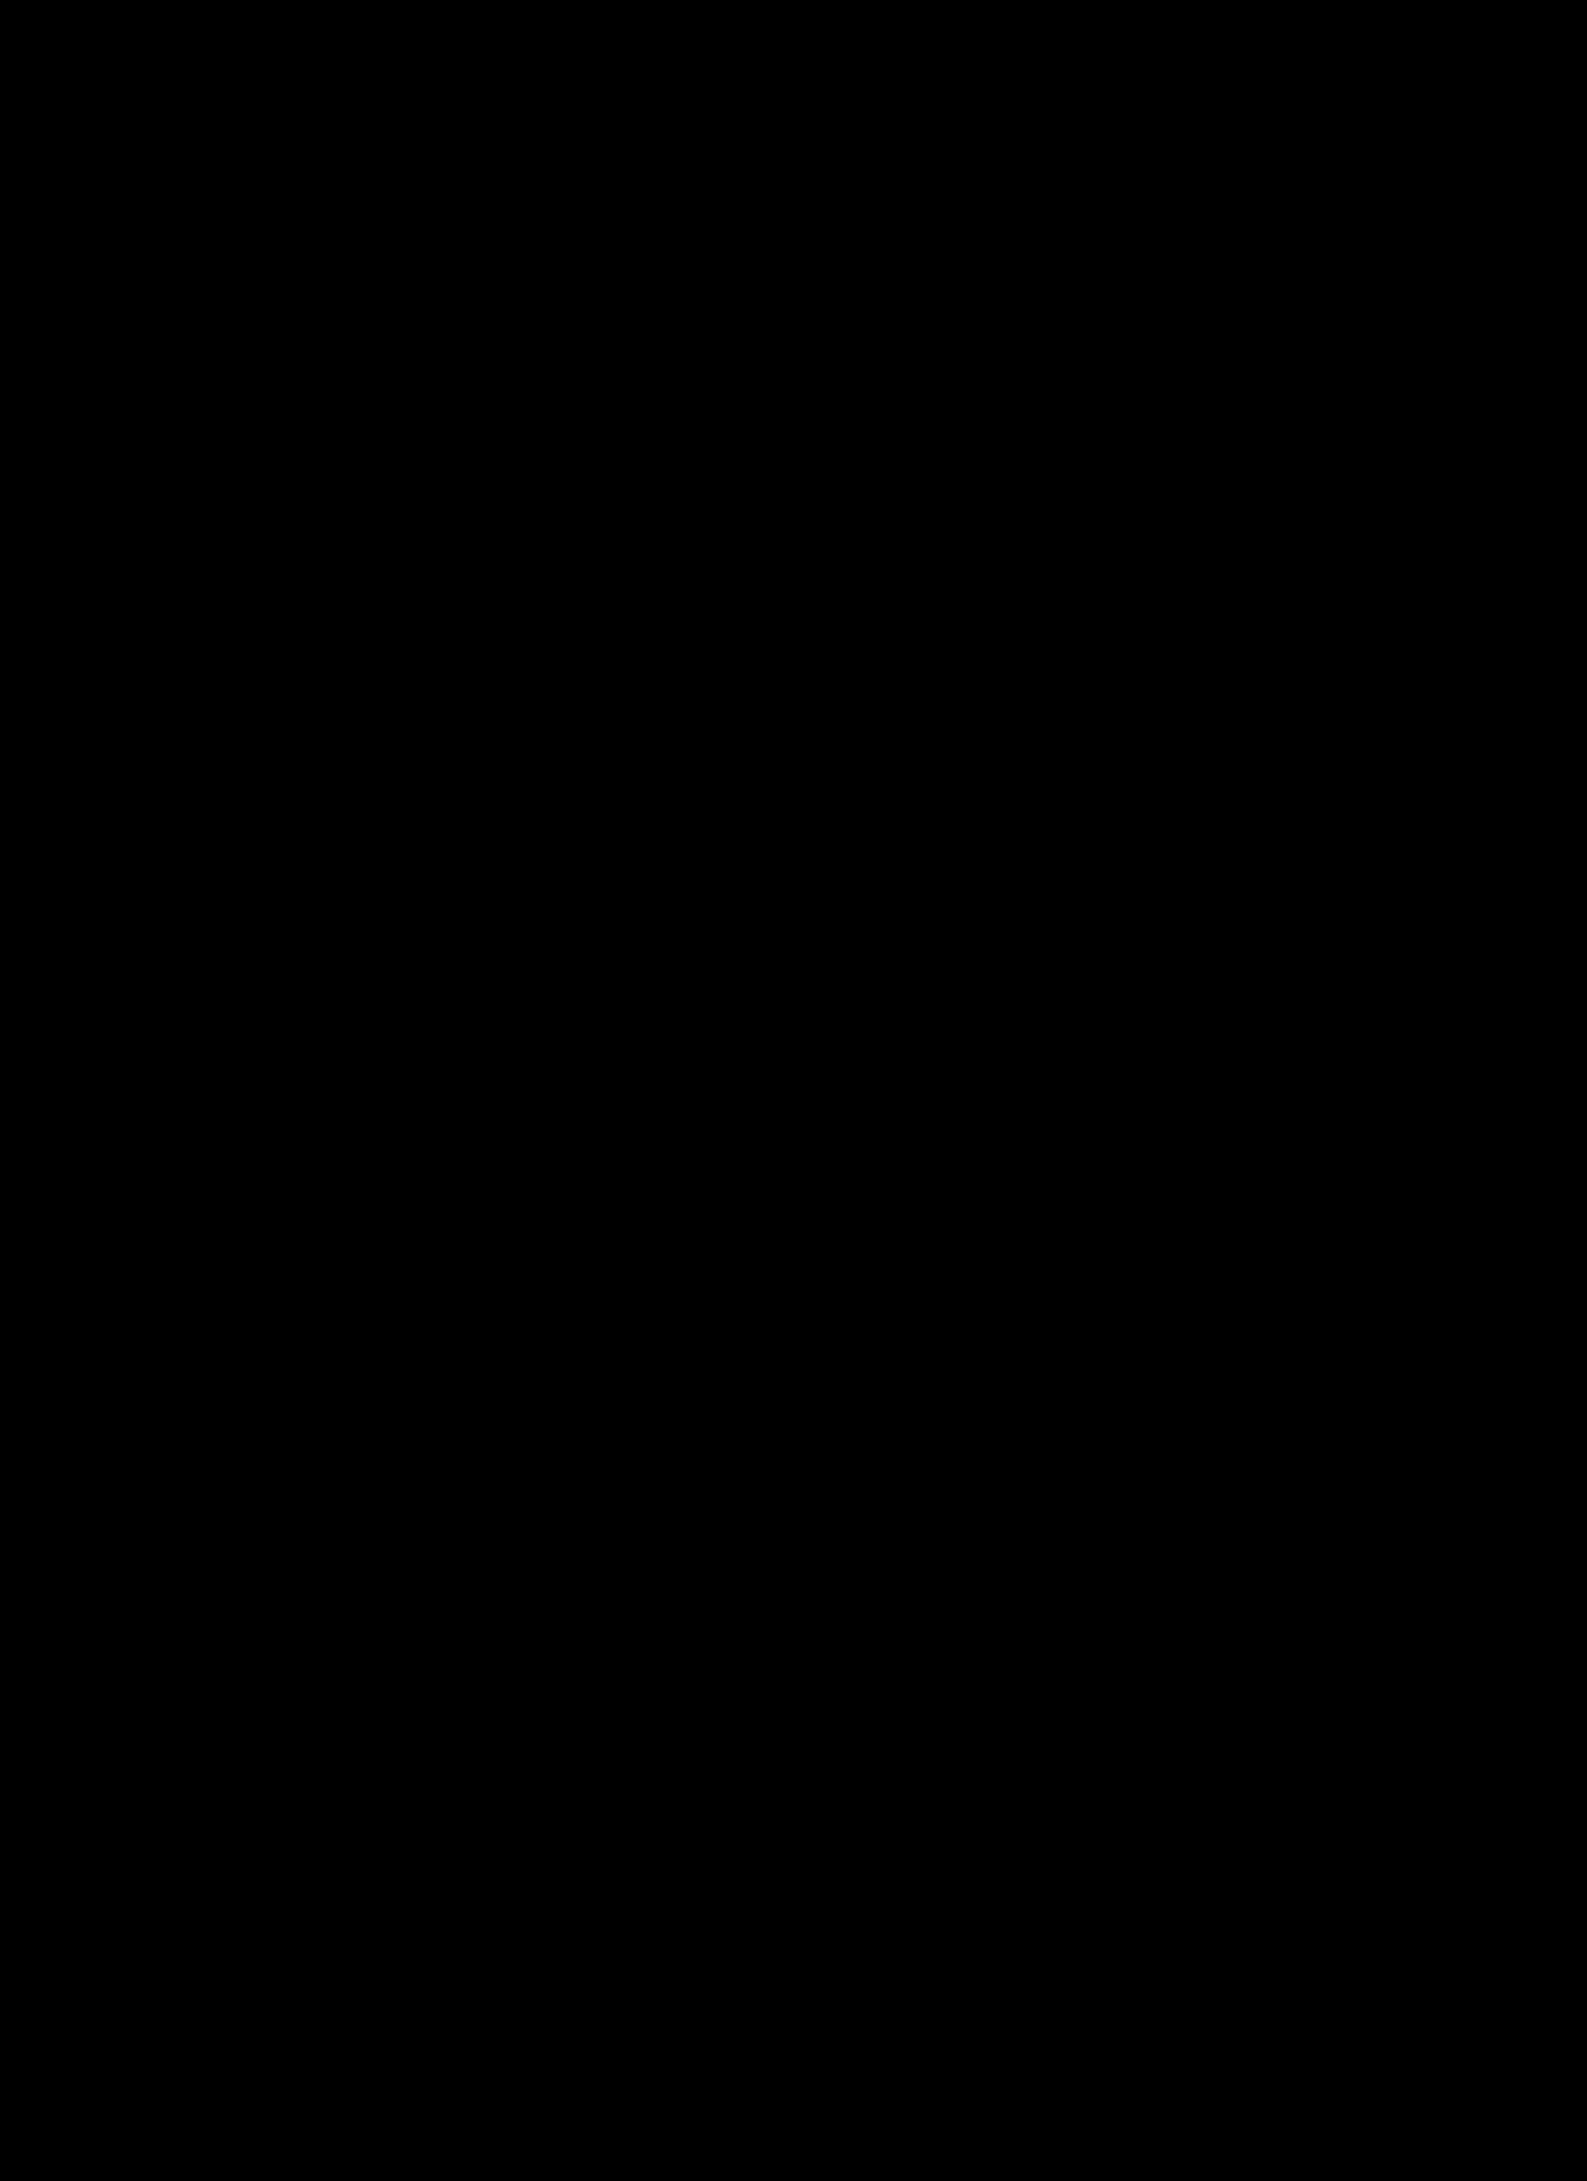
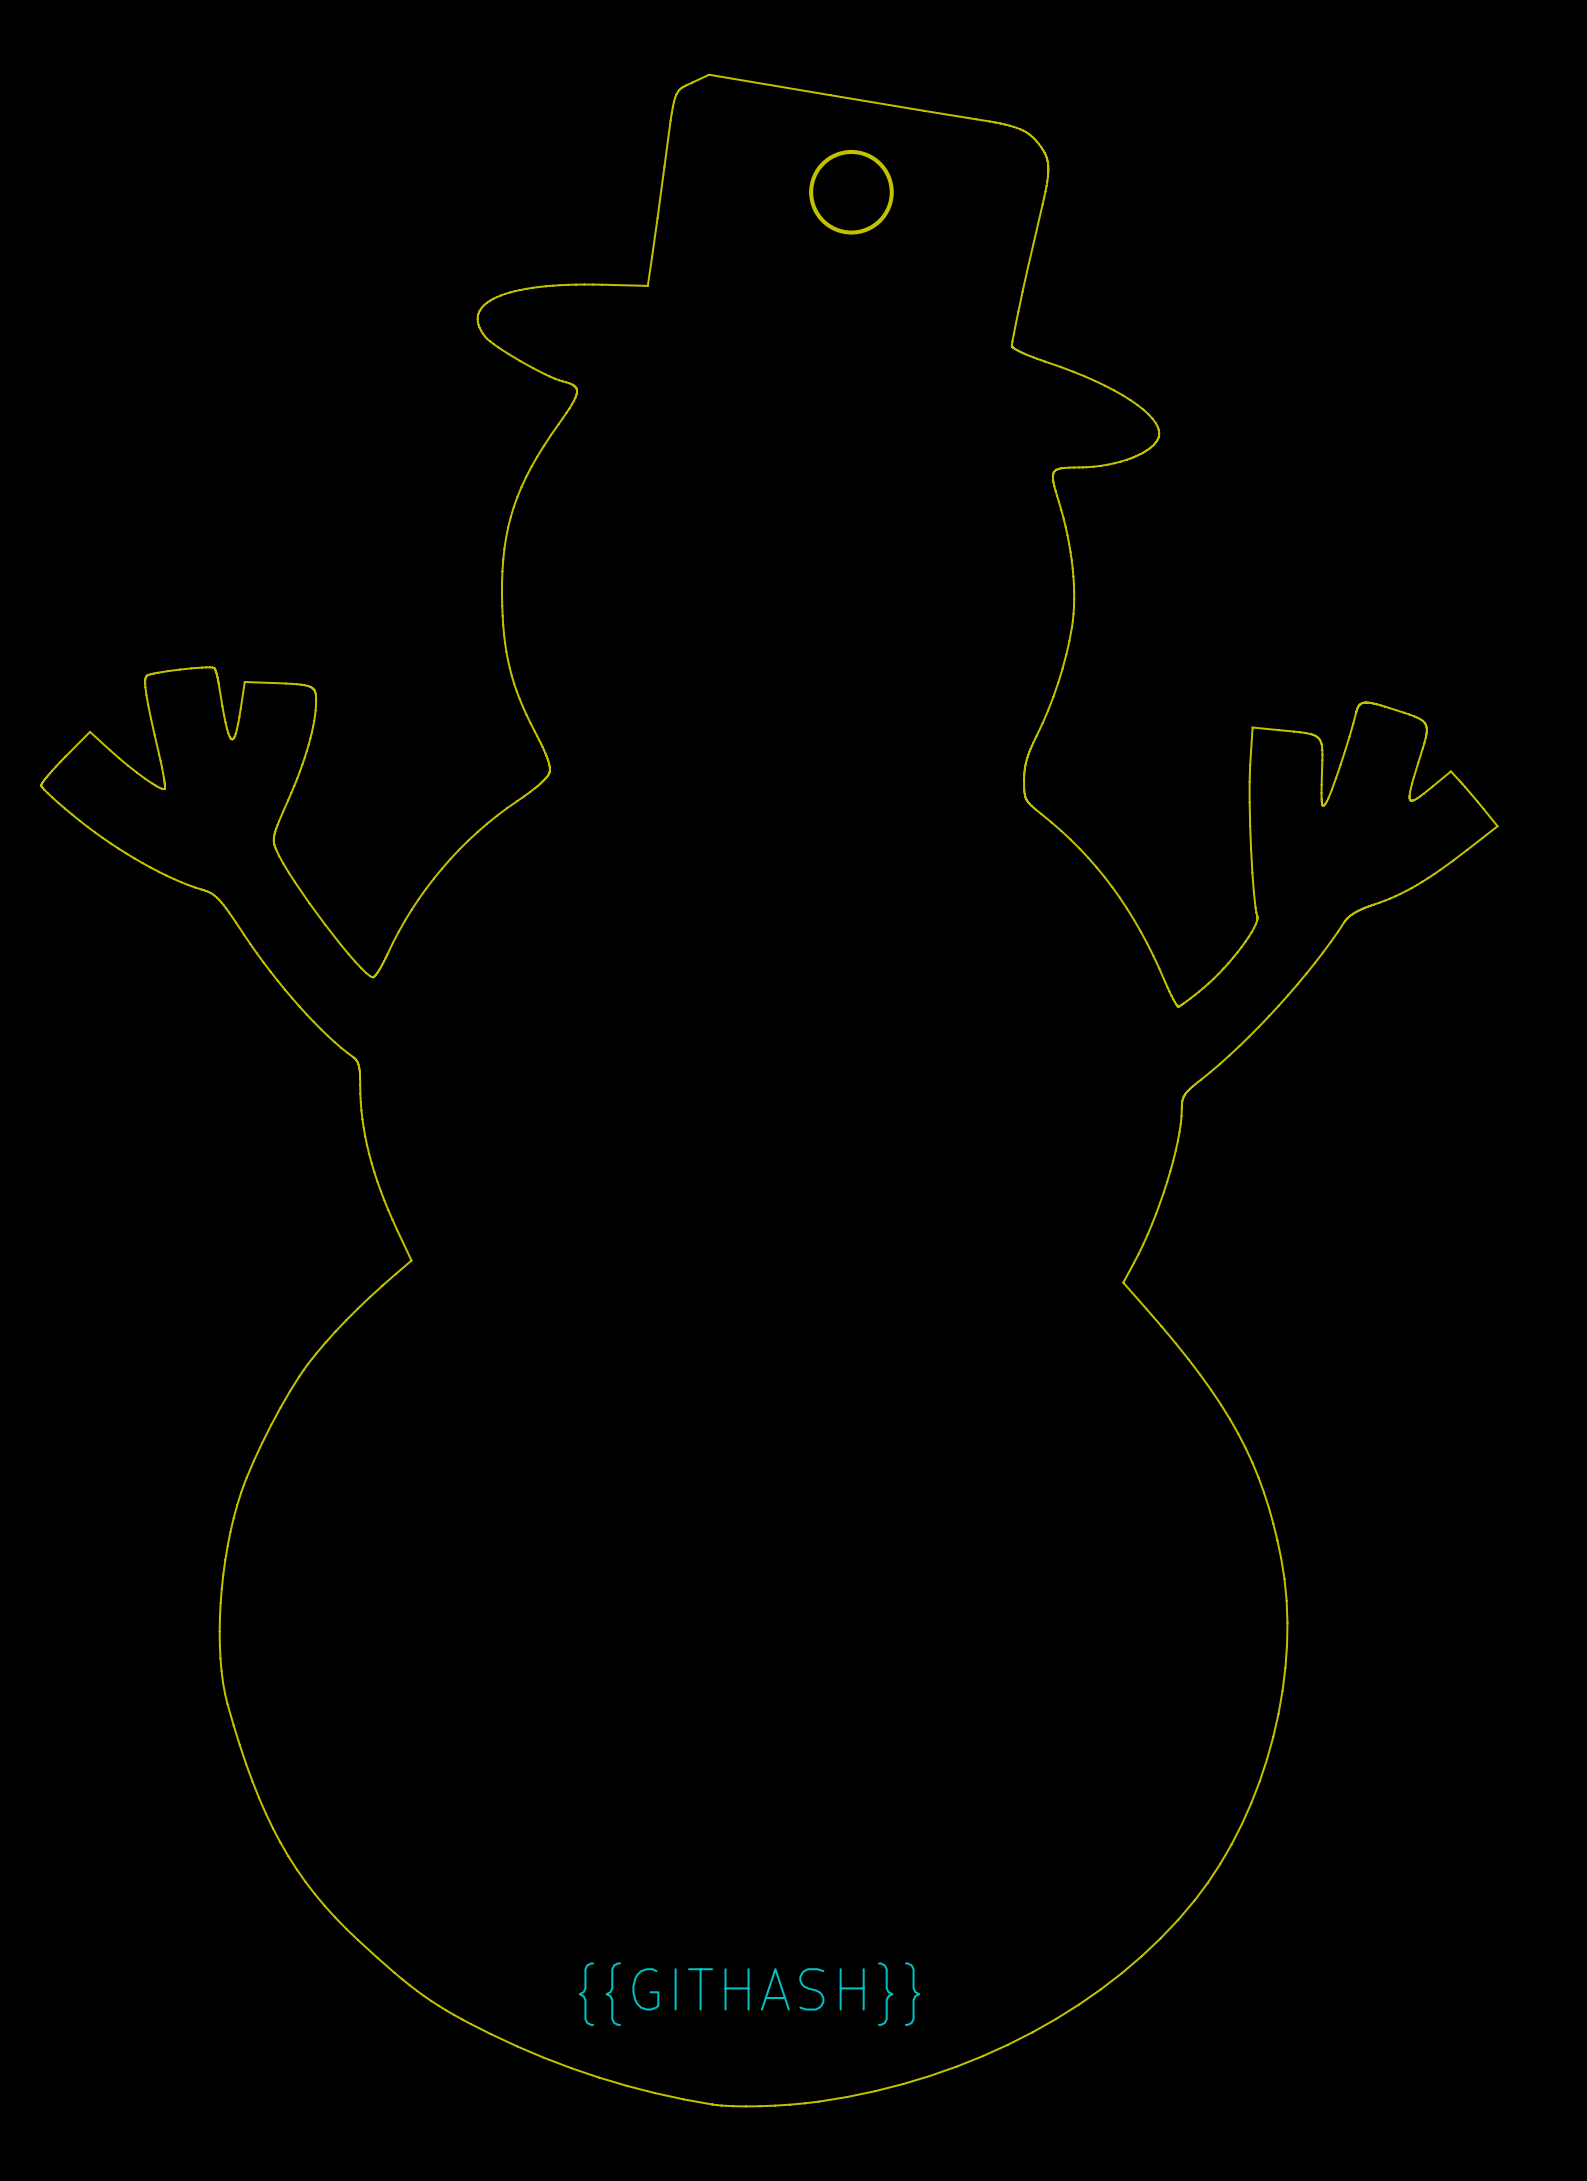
round board edge: none -> [809, 149, 894, 235]
board edge: none -> (1011, 345) (1048, 174) (1045, 154) (1030, 135) (1017, 128) (995, 122) (709, 74) (679, 89) (675, 97) (671, 113) (647, 285) (576, 284) (526, 288) (493, 298) (482, 306) (478, 313) (479, 327) (490, 341) (532, 368) (572, 384) (576, 390) (572, 404) (537, 456) (521, 487) (510, 517) (503, 559) (502, 616) (507, 659) (516, 691) (545, 753) (549, 771) (537, 785) (477, 832) (442, 868) (411, 909) (373, 976)
board edge: none -> (1012, 346) (1024, 353) (1084, 376) (1114, 390) (1143, 409) (1152, 418) (1158, 429) (1158, 436) (1154, 444) (1132, 457) (1100, 465) (1060, 468) (1053, 473) (1053, 482) (1065, 526) (1071, 560) (1073, 613) (1069, 640) (1058, 682) (1026, 759) (1024, 787) (1025, 797) (1029, 803) (1079, 848) (1119, 897) (1147, 943) (1178, 1006)
board edge: none -> (214, 667) (179, 669) (146, 676) (146, 695) (164, 788)
board edge: none -> (214, 668) (226, 728) (232, 739) (236, 729) (244, 682) (301, 684) (309, 686) (314, 691) (315, 710) (310, 738) (299, 771) (276, 828) (274, 843) (288, 872) (325, 924) (355, 961) (372, 977)
board edge: none -> (41, 784) (56, 766) (90, 731) (136, 772) (164, 789)
board edge: none -> (41, 785) (72, 814) (118, 848) (166, 875) (214, 895) (292, 998) (327, 1035) (356, 1059) (359, 1071) (363, 1127) (371, 1163) (388, 1210) (411, 1260) (346, 1320) (316, 1353) (299, 1376) (280, 1407) (253, 1460) (241, 1492) (230, 1531) (223, 1574) (219, 1617) (223, 1682) (227, 1704) (245, 1763) (265, 1813) (280, 1842) (305, 1882) (346, 1928) (409, 1985) (453, 2014) (517, 2046) (598, 2077) (683, 2099) (716, 2105) (746, 2106) (818, 2101) (902, 2084) (982, 2056) (1056, 2019) (1121, 1973) (1178, 1919) (1220, 1864) (1251, 1803) (1273, 1736) (1285, 1668) (1286, 1600) (1281, 1557) (1273, 1524) (1252, 1462) (1221, 1404) (1175, 1343) (1123, 1282) (1147, 1234) (1163, 1192) (1175, 1150) (1182, 1101) (1186, 1093) (1239, 1046) (1278, 1005) (1314, 963) (1348, 917) (1422, 881) (1497, 826) (1450, 771) (1420, 796) (1410, 800) (1410, 788) (1426, 735) (1426, 725) (1422, 721) (1414, 716) (1369, 702) (1361, 703) (1357, 707) (1335, 778) (1323, 805)
board edge: none -> (1322, 805) (1322, 750) (1318, 738) (1305, 733) (1252, 727) (1249, 781) (1250, 825) (1257, 920) (1245, 941) (1223, 968) (1203, 987) (1178, 1006)
text: none -> {{GITHASH}} (749, 1994)

